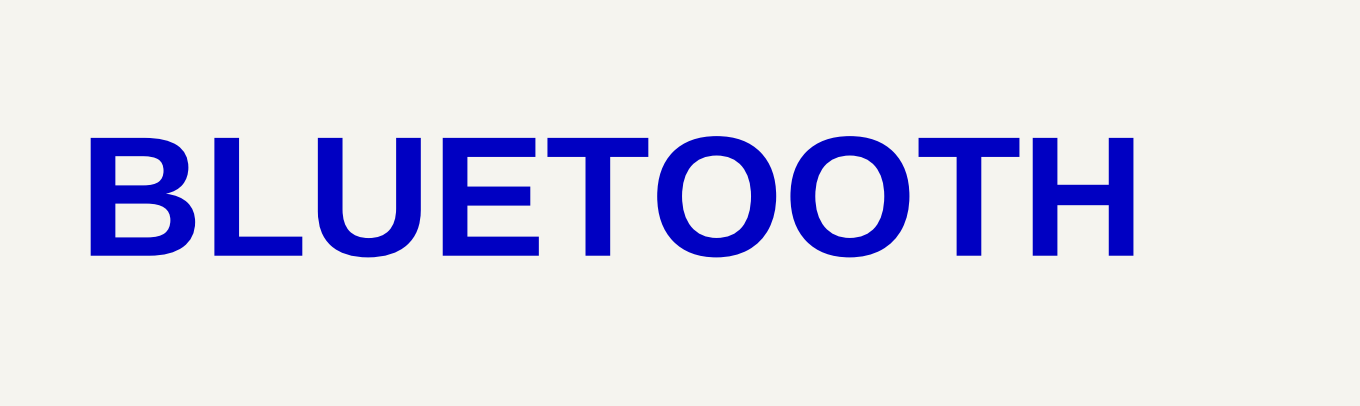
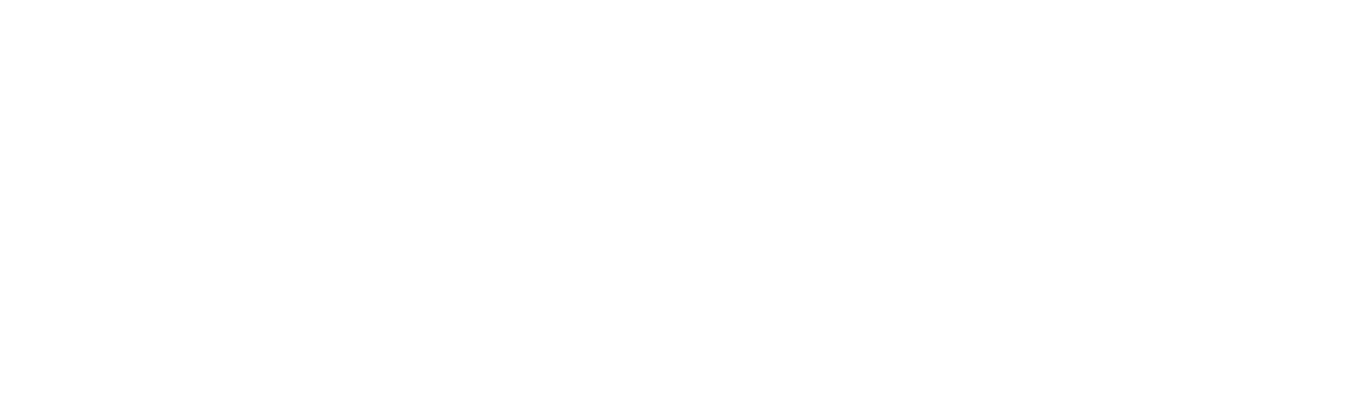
text: BLUETOOTH (612, 196) -> none

